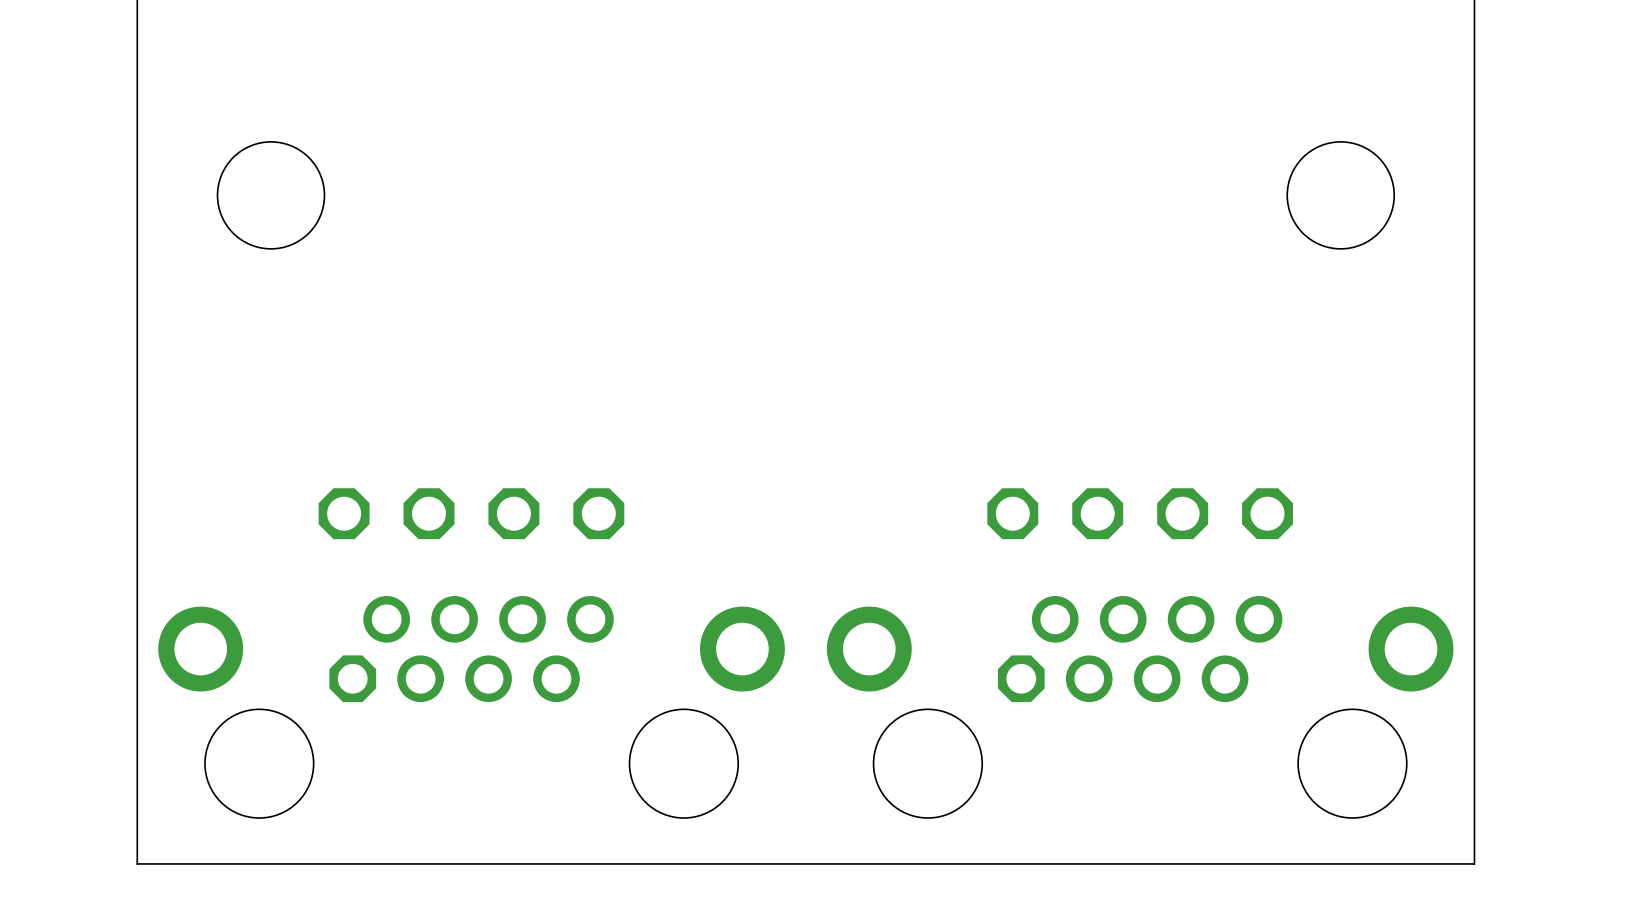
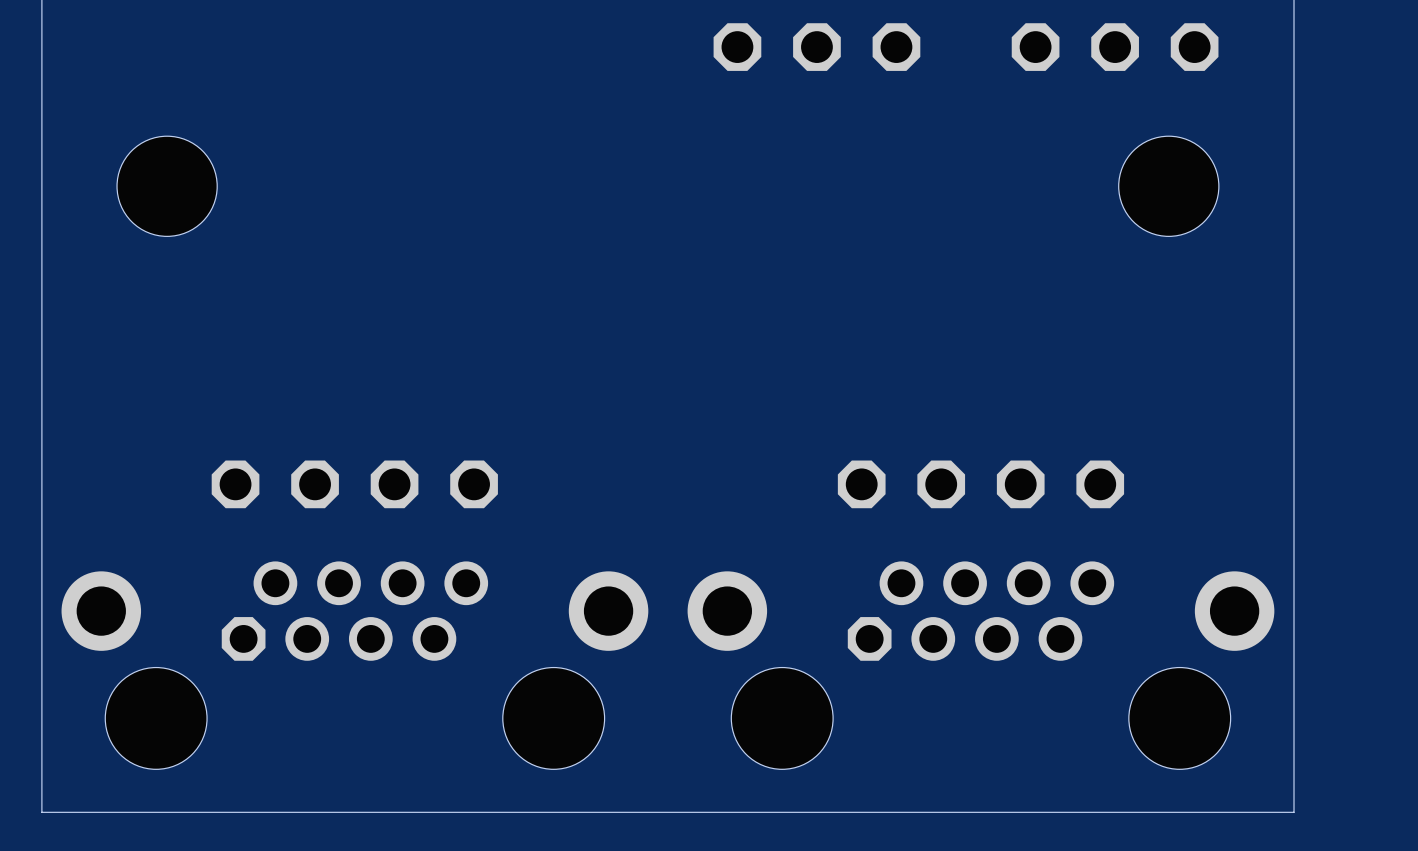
part: none -> (816, 47)
part: none -> (1115, 47)

